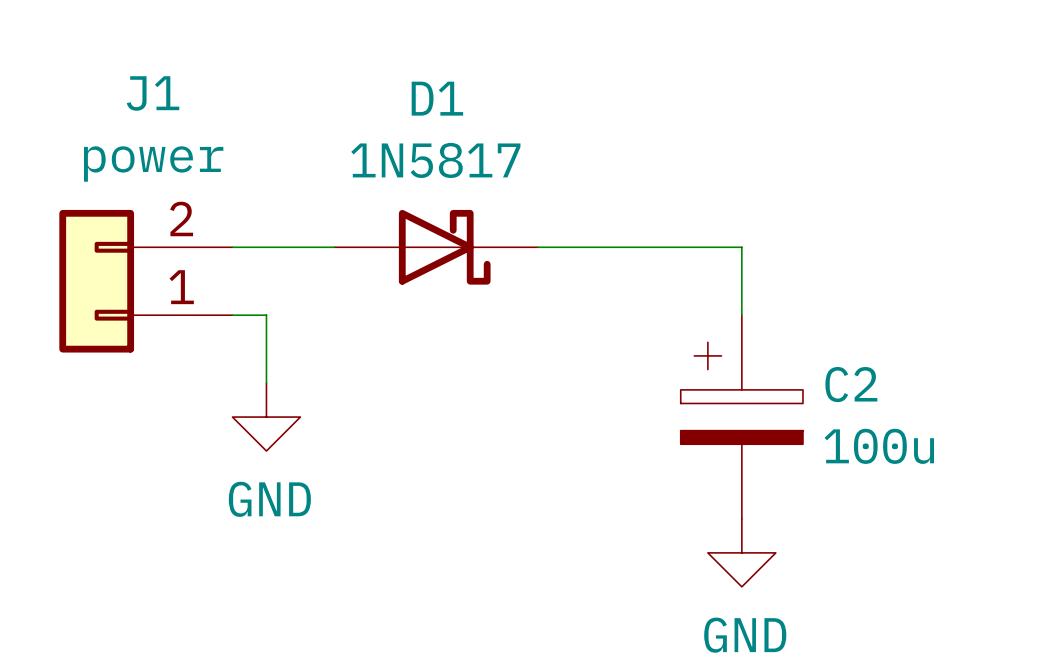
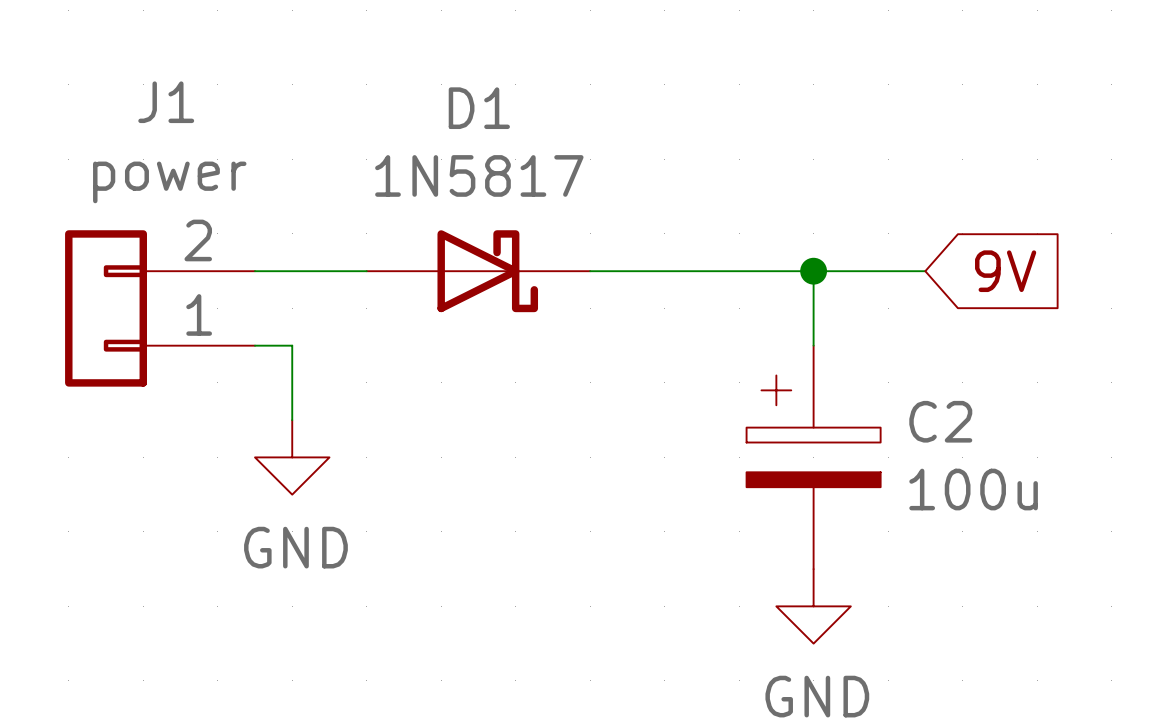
global label: none -> 9V (1005, 271)
wire: none -> (813, 271) (925, 271)
junction: none -> (813, 271)

